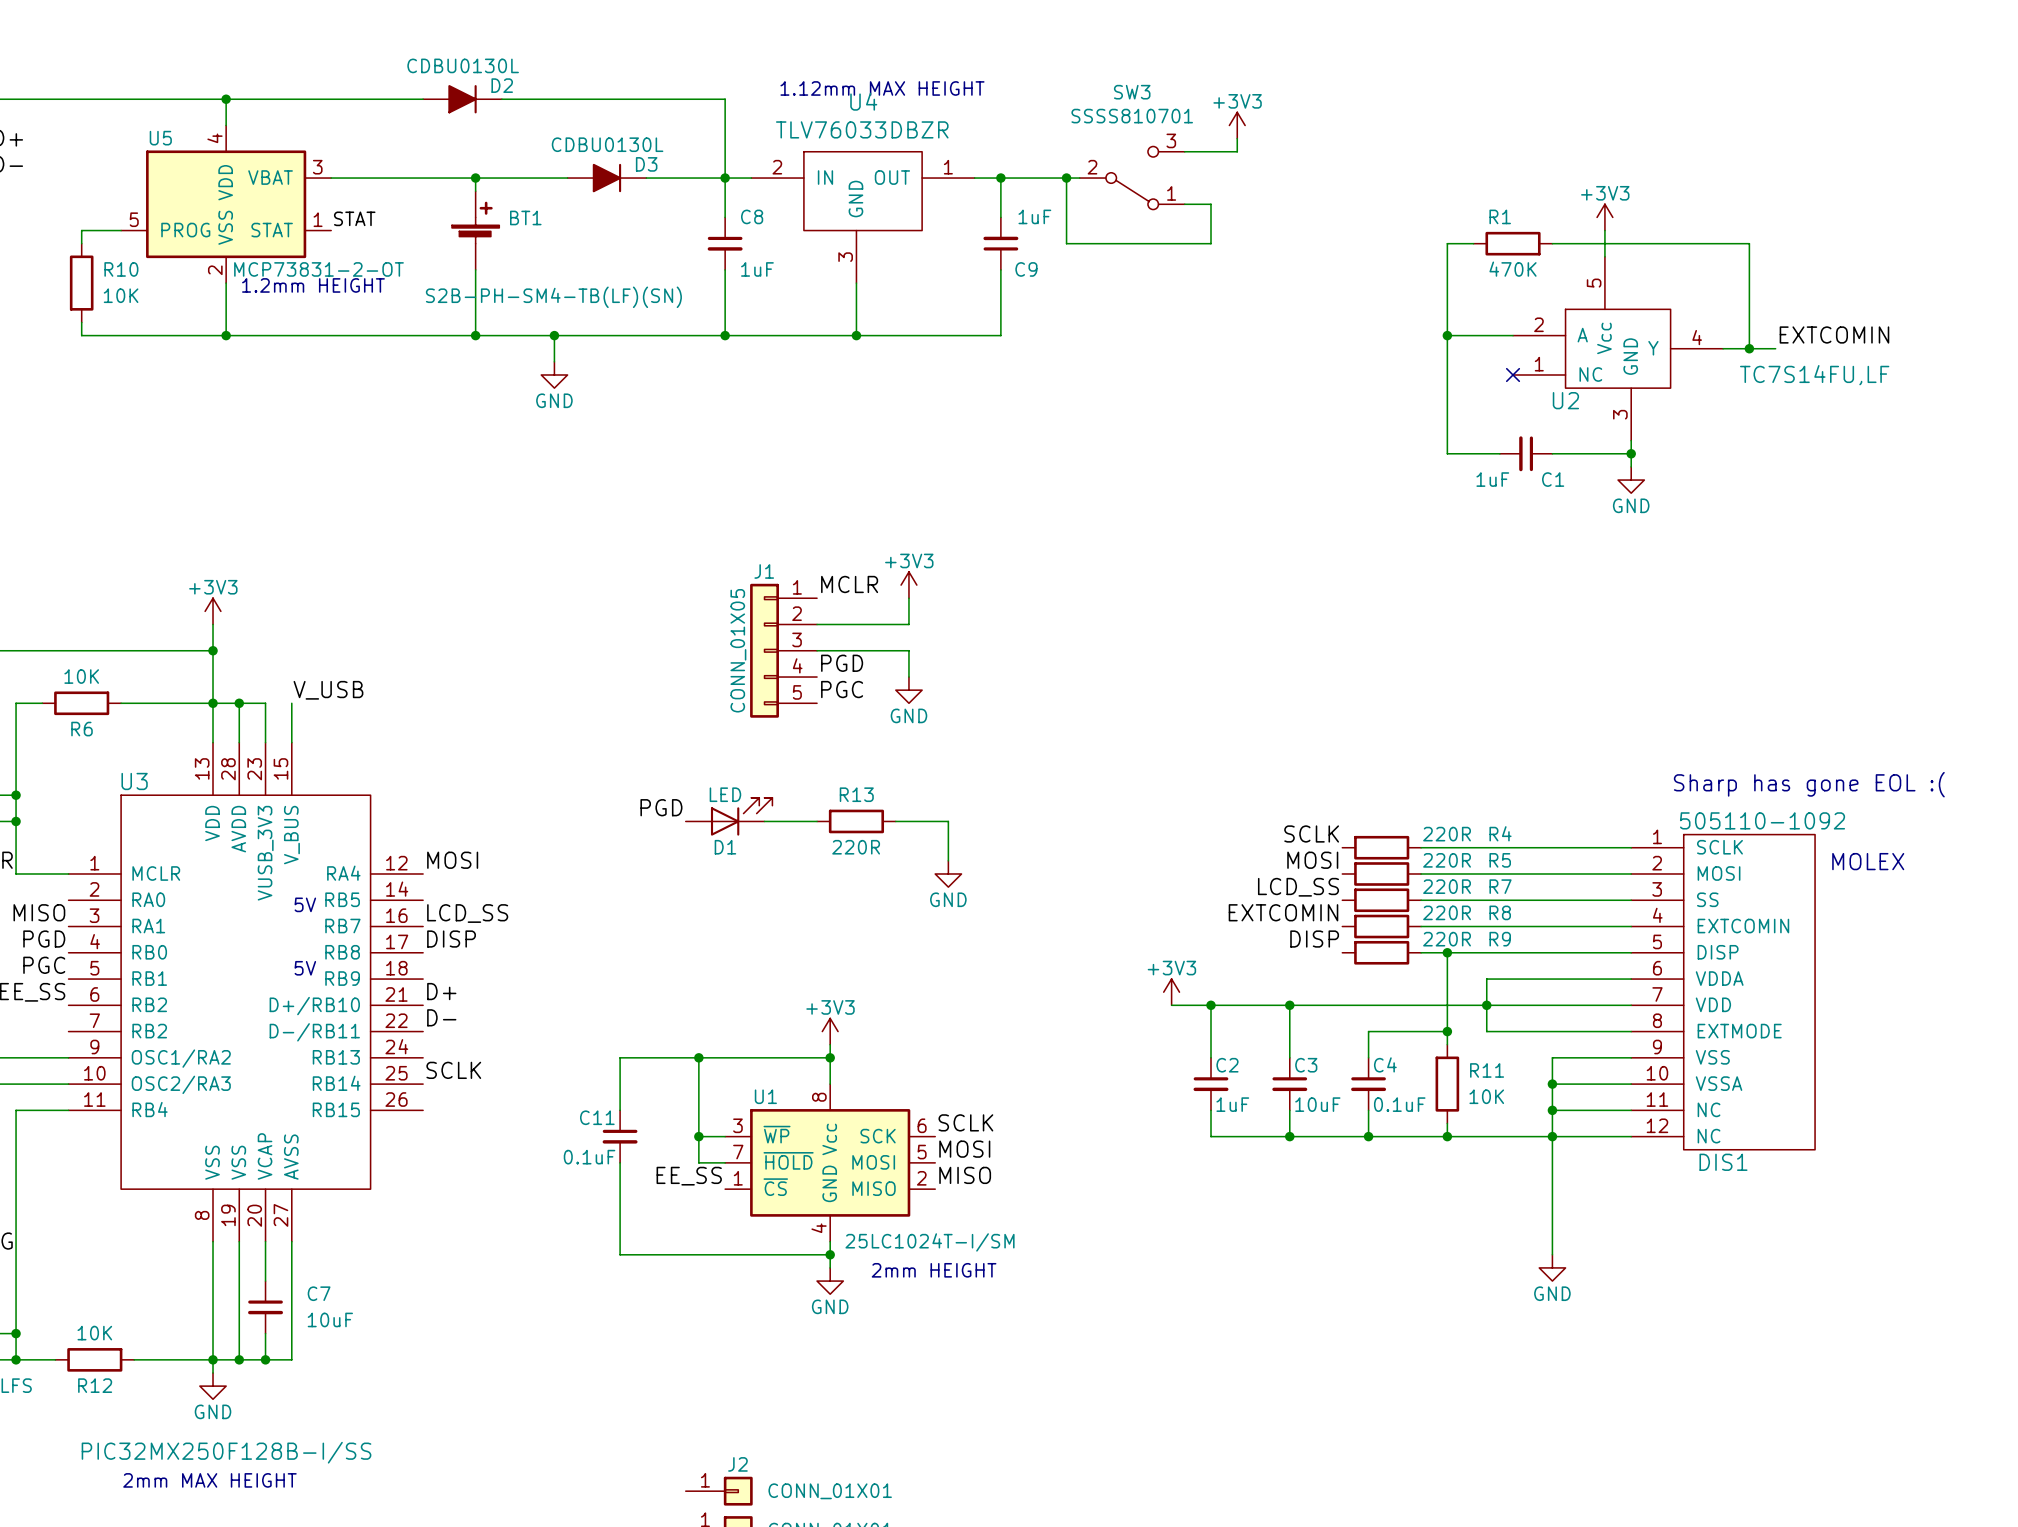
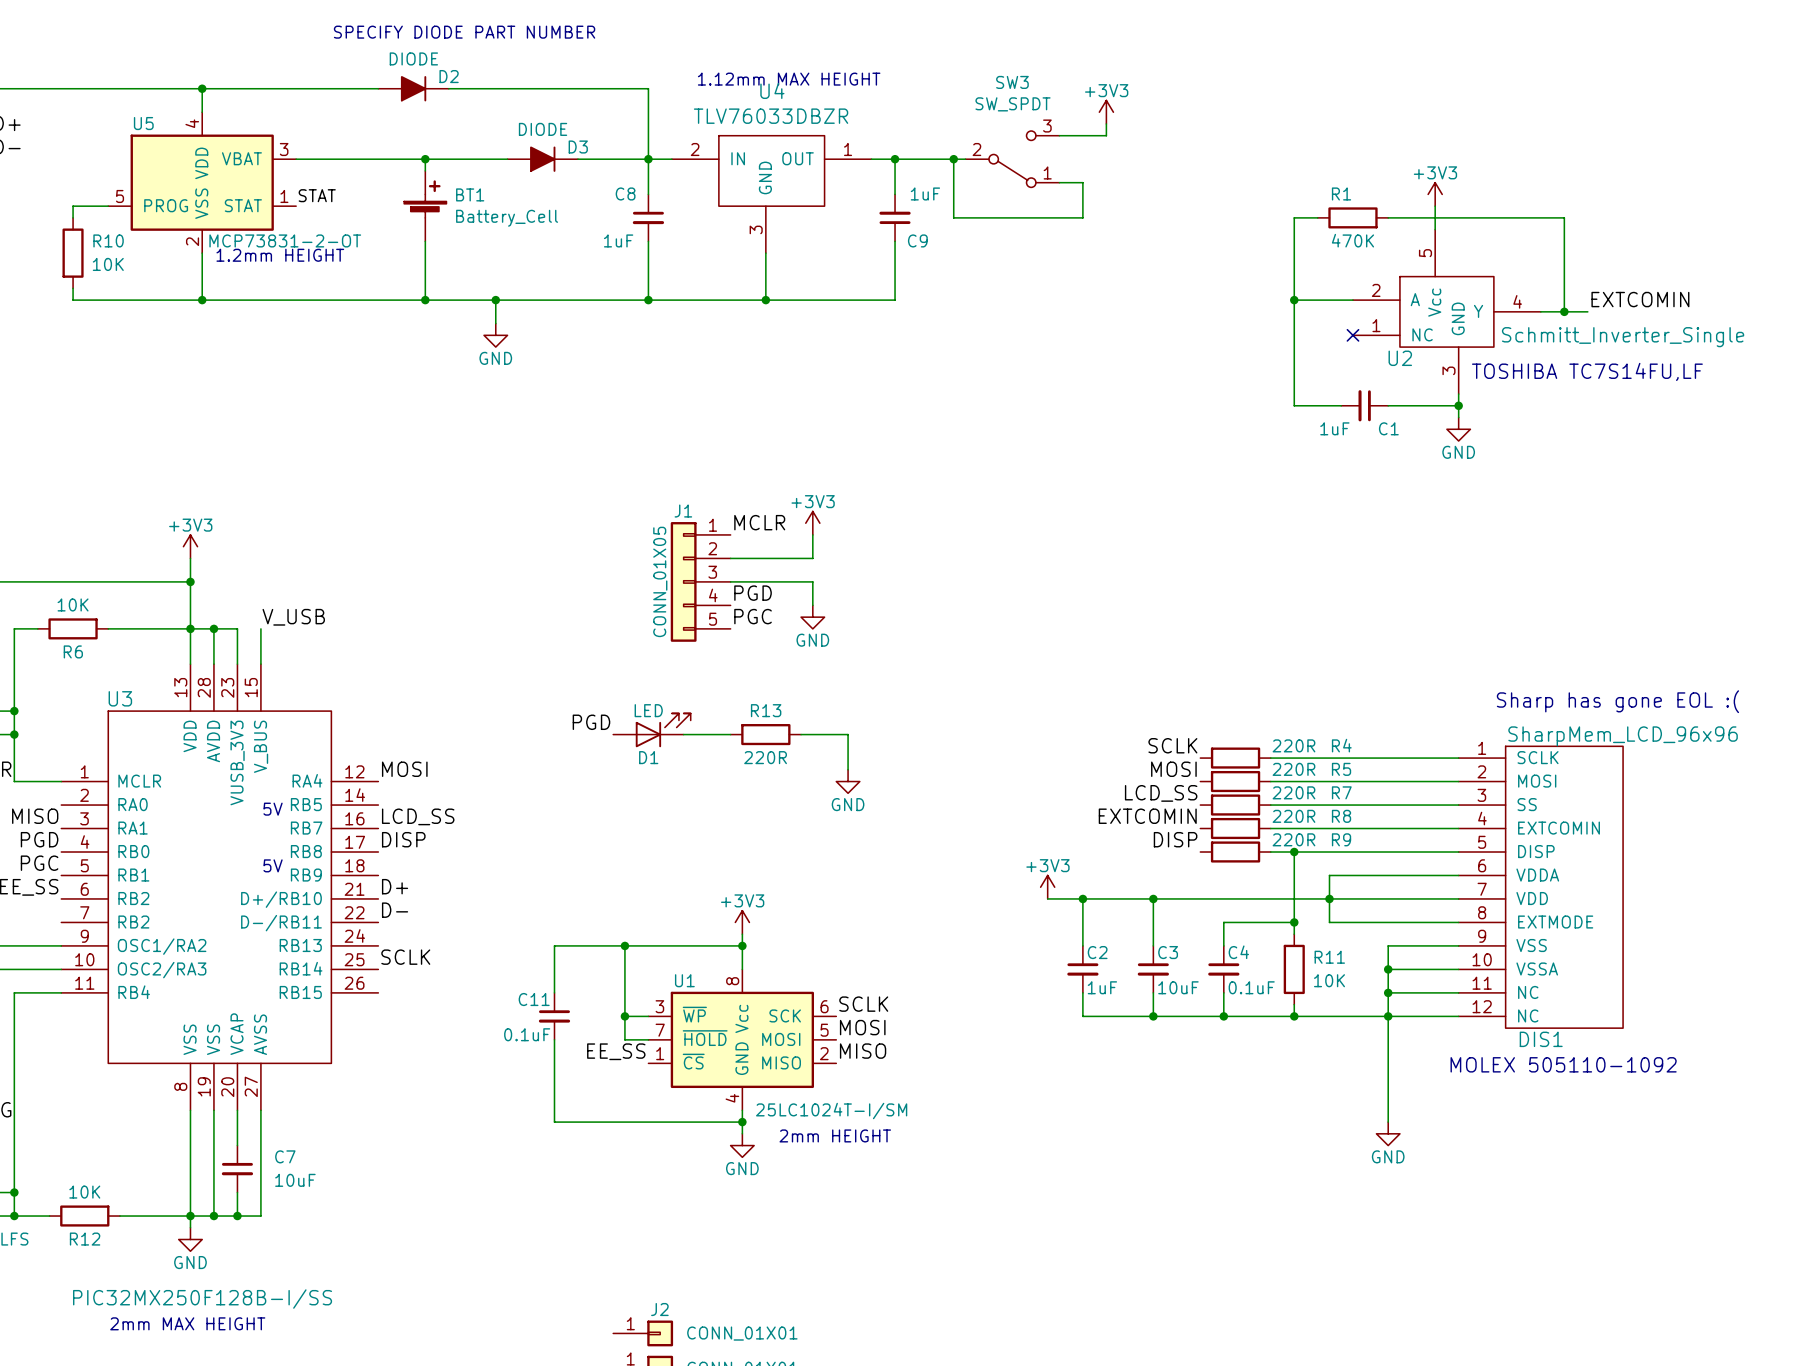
text: none -> SPECIFY DIODE PART NUMBER (464, 32)
D2 value: CDBU0130L (463, 65) -> DIODE (413, 58)
SW3 value: SSSS810701 (1132, 116) -> SW_SPDT (1013, 104)
D3 value: CDBU0130L (607, 144) -> DIODE (543, 129)
C8 name position: C8 (752, 216) -> C8 (625, 193)
C8 value position: 1uF (757, 269) -> 1uF (618, 240)
BT1 value: S2B-PH-SM4-TB(LF)(SN) (553, 297) -> Battery_Cell (507, 218)
U2 value: TC7S14FU,LF (1814, 375) -> Schmitt_Inverter_Single (1623, 337)
text: none -> TOSHIBA TC7S14FU,LF (1587, 371)
DIS1 value: 505110-1092 (1762, 820) -> SharpMem_LCD_96x96 (1623, 736)
text: MOLEX (1868, 861) -> none
text: none -> MOLEX 505110-1092 (1563, 1064)

